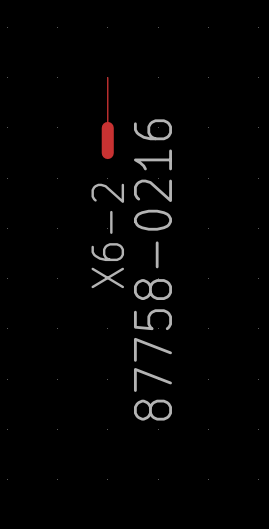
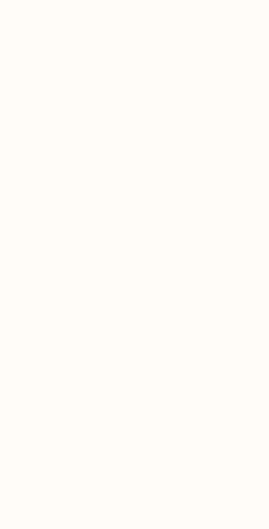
X6-2: 87758-0216 (107, 118) -> none

